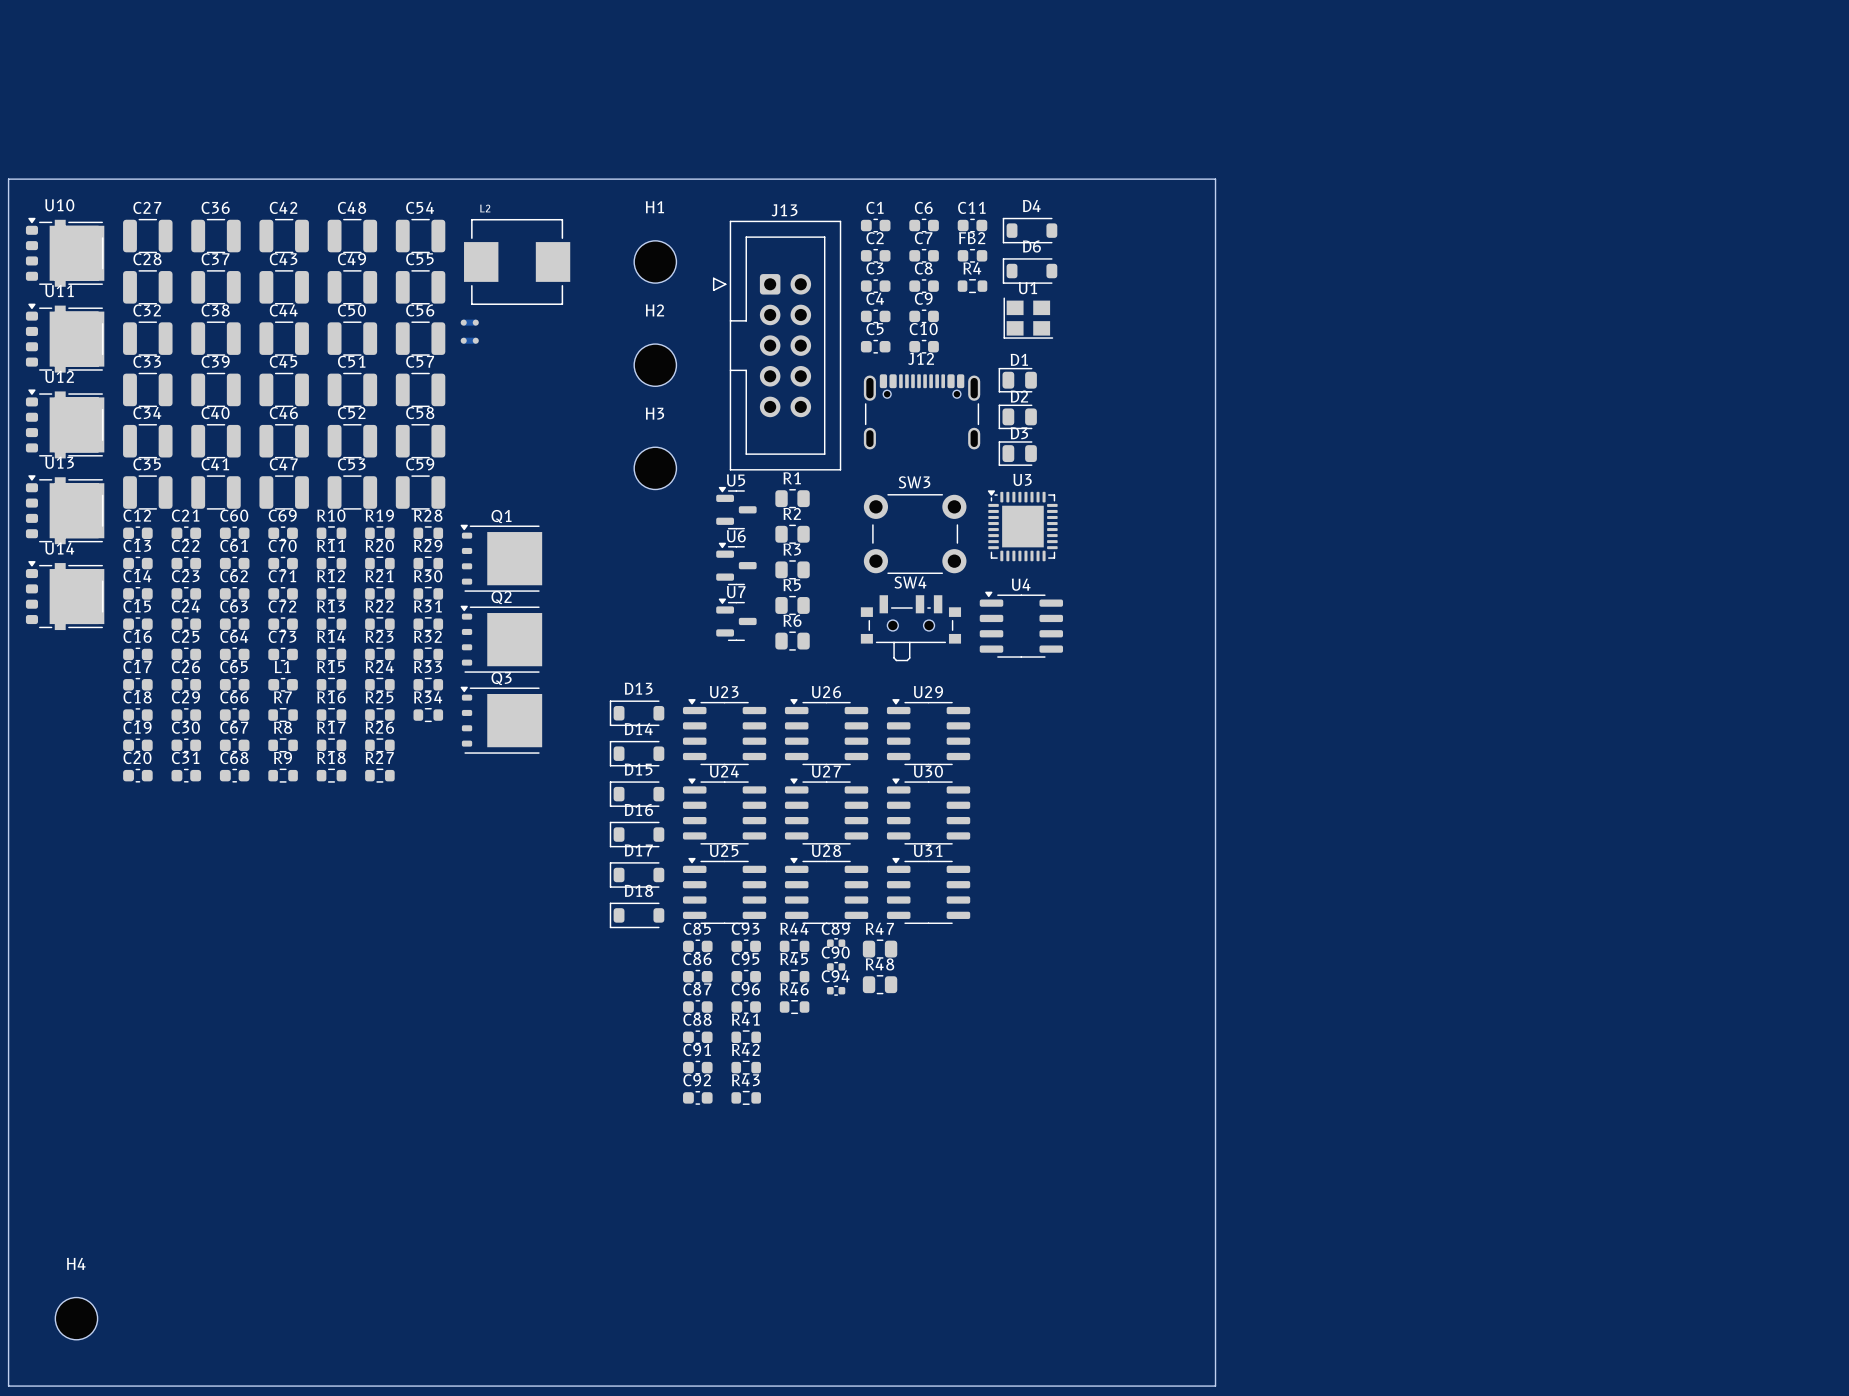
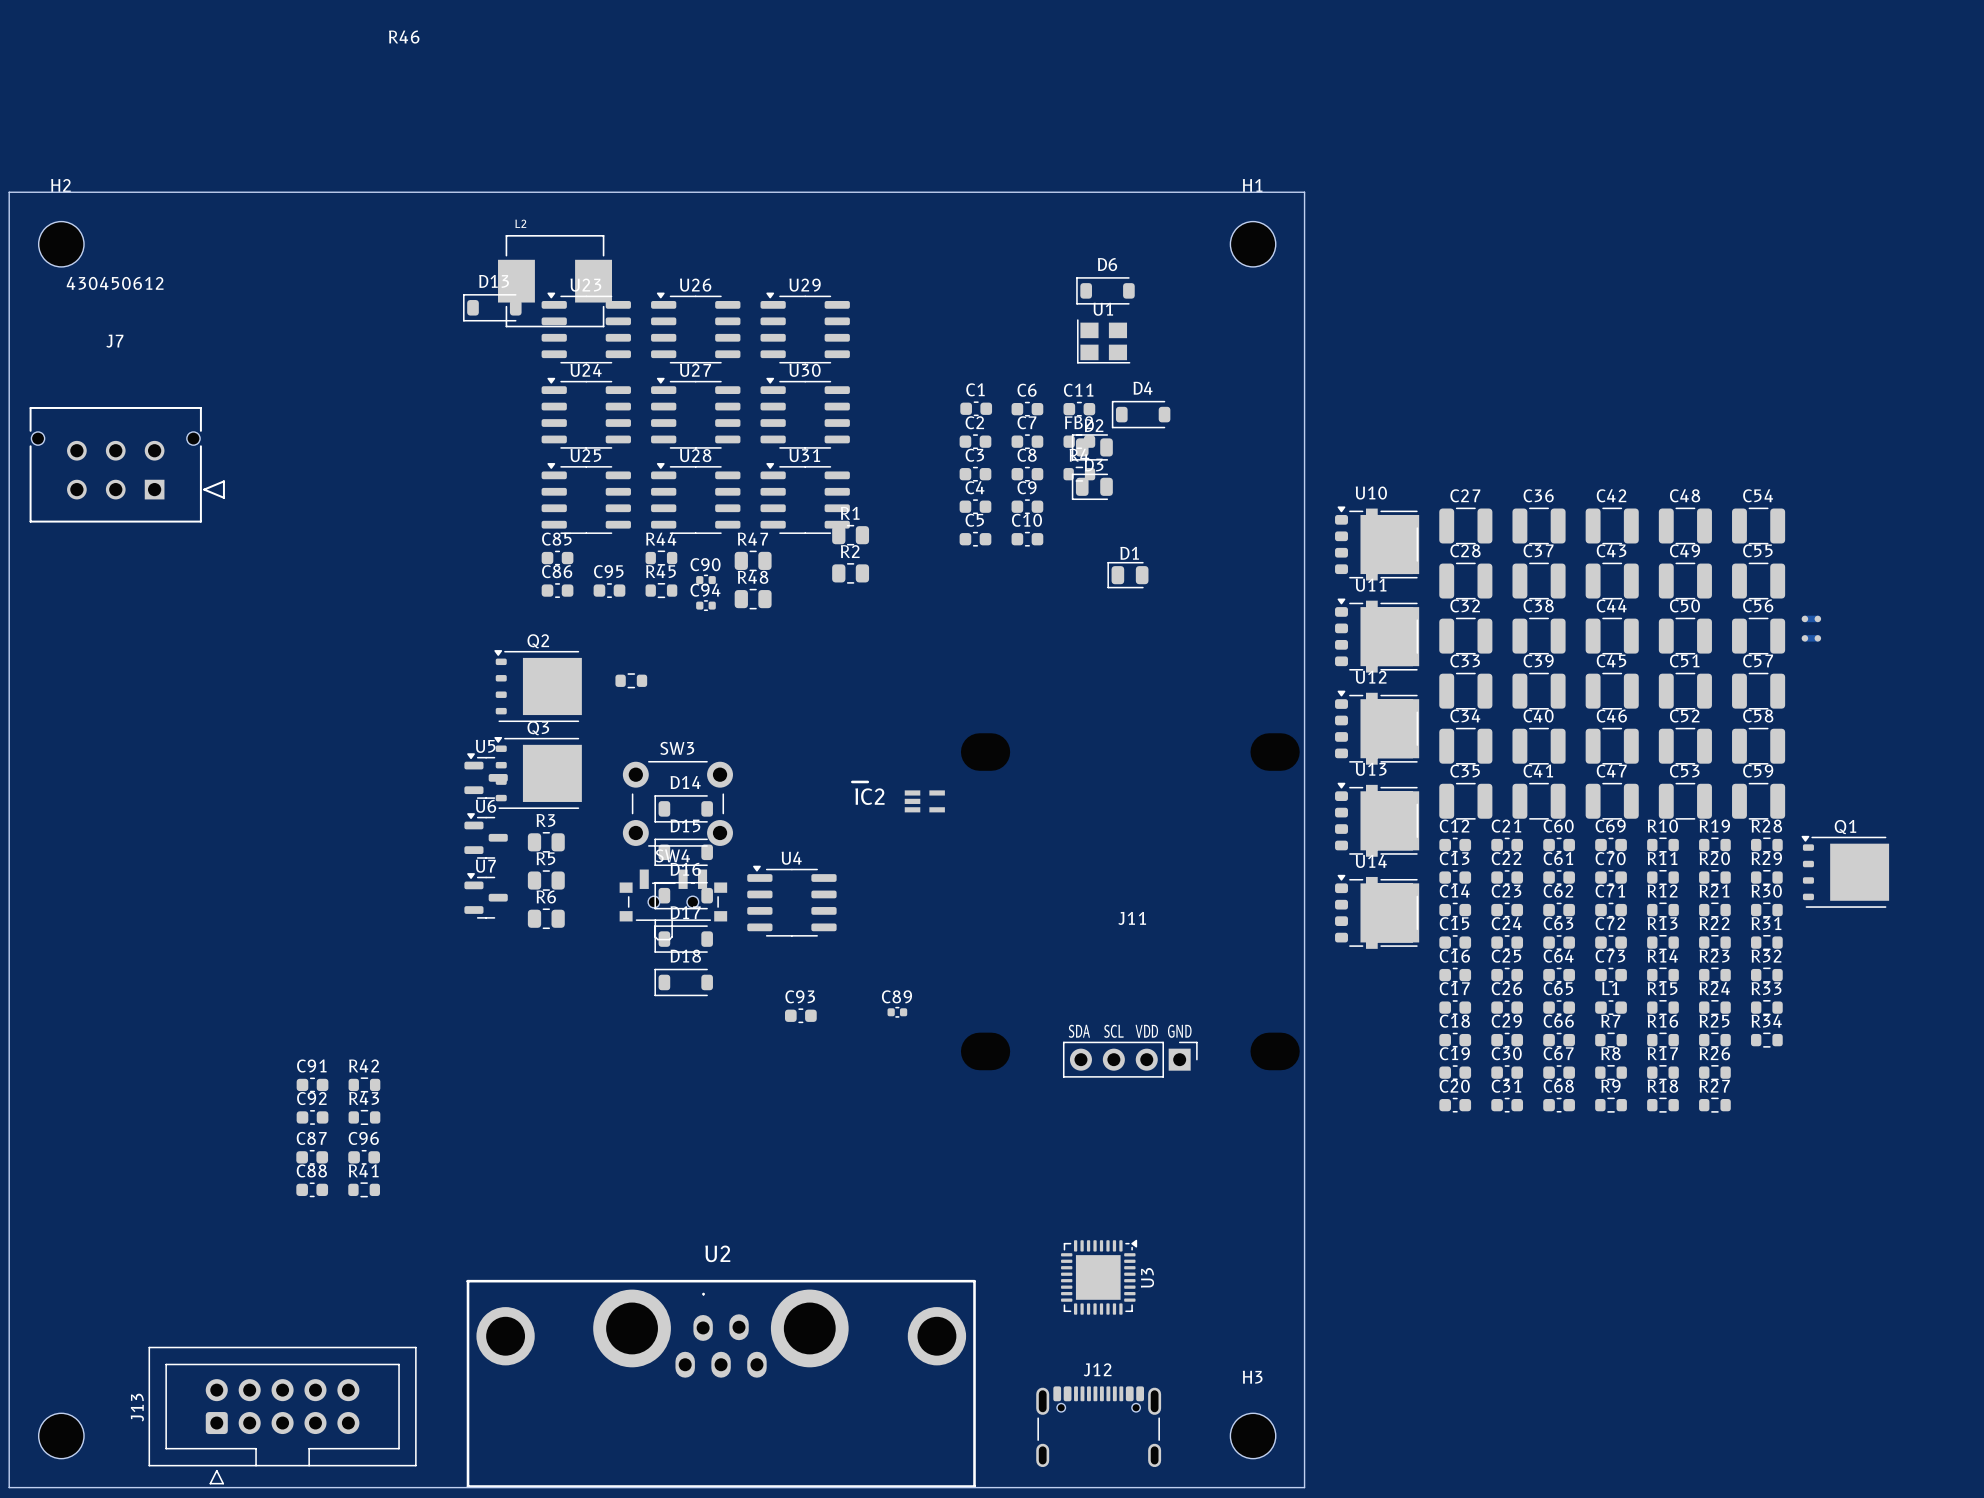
C1 position: (875, 225) -> (976, 408)
C6 position: (924, 225) -> (1027, 409)
C11 position: (972, 225) -> (1079, 409)
D4 position: (1030, 230) -> (1141, 414)
C27 position: (147, 236) -> (1465, 525)
C36 position: (215, 236) -> (1539, 525)
C42 position: (284, 236) -> (1612, 525)
C48 position: (352, 236) -> (1685, 525)
C54 position: (420, 236) -> (1758, 525)
U10 position: (65, 252) -> (1377, 543)
C2 position: (875, 255) -> (975, 441)
C7 position: (924, 255) -> (1027, 441)
FB2 position: (972, 255) -> (1079, 441)
H1 position: (655, 261) -> (1253, 244)
C3 position: (875, 286) -> (975, 474)
C8 position: (924, 286) -> (1027, 474)
R4 position: (972, 286) -> (1079, 474)
C28 position: (147, 287) -> (1465, 581)
C37 position: (215, 287) -> (1539, 581)
C43 position: (284, 287) -> (1612, 581)
C49 position: (352, 287) -> (1685, 581)
C55 position: (420, 287) -> (1758, 581)
C4 position: (875, 316) -> (975, 506)
C9 position: (924, 316) -> (1027, 506)
part: (469, 322) -> none
U11 position: (65, 338) -> (1377, 635)
C32 position: (147, 338) -> (1465, 636)
C38 position: (215, 338) -> (1539, 636)
C44 position: (284, 338) -> (1612, 636)
C50 position: (352, 338) -> (1685, 636)
C56 position: (420, 338) -> (1758, 636)
part: (469, 340) -> none
J13 rotation: 0° (777, 345) -> 90° counterclockwise (282, 1415)
J13 position: (777, 345) -> (282, 1415)
C5 position: (875, 346) -> (975, 539)
C10 position: (924, 346) -> (1027, 539)
H2 position: (655, 365) -> (61, 244)
D1 position: (1017, 380) -> (1127, 575)
C33 position: (147, 389) -> (1465, 691)
C39 position: (215, 389) -> (1539, 691)
C45 position: (284, 389) -> (1612, 691)
C51 position: (352, 389) -> (1685, 691)
C57 position: (420, 389) -> (1758, 691)
J12 position: (922, 411) -> (1098, 1426)
U12 position: (65, 423) -> (1377, 727)
J7: none -> (127, 464)
C34 position: (147, 441) -> (1465, 746)
C40 position: (215, 441) -> (1539, 746)
C46 position: (284, 441) -> (1612, 746)
C52 position: (352, 441) -> (1685, 746)
C58 position: (420, 441) -> (1758, 746)
H3 position: (655, 468) -> (1253, 1435)
C35 position: (147, 492) -> (1465, 801)
C41 position: (215, 492) -> (1539, 801)
C47 position: (284, 492) -> (1612, 801)
C53 position: (352, 492) -> (1685, 801)
C59 position: (420, 492) -> (1758, 801)
U5 position: (736, 508) -> (486, 776)
U13 position: (65, 509) -> (1377, 819)
U3 rotation: 0° (1022, 525) -> 90° clockwise (1099, 1277)
U3 position: (1022, 525) -> (1099, 1277)
C12 position: (137, 533) -> (1455, 845)
C21 position: (186, 533) -> (1507, 845)
C60 position: (234, 533) -> (1559, 845)
C69 position: (283, 533) -> (1611, 845)
R10 position: (331, 533) -> (1662, 845)
R19 position: (379, 533) -> (1714, 845)
R28 position: (428, 533) -> (1766, 845)
SW3 position: (915, 534) -> (677, 803)
Q1 position: (501, 558) -> (1845, 871)
C13 position: (137, 563) -> (1455, 877)
C22 position: (186, 563) -> (1507, 877)
C61 position: (234, 563) -> (1559, 877)
C70 position: (283, 563) -> (1611, 877)
R11 position: (331, 563) -> (1662, 877)
R20 position: (379, 563) -> (1714, 877)
R29 position: (428, 563) -> (1766, 877)
U6 position: (736, 563) -> (486, 835)
R3 position: (792, 569) -> (546, 842)
part: none -> (1811, 618)
C14 position: (137, 593) -> (1455, 910)
C23 position: (186, 593) -> (1507, 910)
C62 position: (234, 593) -> (1559, 910)
C71 position: (283, 593) -> (1611, 910)
R12 position: (331, 593) -> (1662, 910)
R21 position: (379, 593) -> (1714, 910)
R30 position: (428, 593) -> (1766, 910)
part: none -> (1811, 638)
U14 position: (65, 595) -> (1377, 911)
R5 position: (792, 605) -> (546, 880)
U7 position: (736, 619) -> (486, 895)
C15 position: (137, 624) -> (1455, 942)
C24 position: (186, 624) -> (1507, 942)
C63 position: (234, 624) -> (1559, 942)
C72 position: (283, 624) -> (1611, 942)
R13 position: (331, 624) -> (1662, 942)
R22 position: (379, 624) -> (1714, 942)
R31 position: (428, 624) -> (1766, 942)
U4 position: (1021, 624) -> (791, 901)
SW4 position: (910, 628) -> (673, 904)
R6 position: (792, 641) -> (546, 918)
C16 position: (137, 654) -> (1455, 975)
C25 position: (186, 654) -> (1507, 975)
C64 position: (234, 654) -> (1559, 975)
C73 position: (283, 654) -> (1611, 975)
R14 position: (331, 654) -> (1662, 975)
R23 position: (379, 654) -> (1714, 975)
R32 position: (428, 654) -> (1766, 975)
C17 position: (137, 684) -> (1455, 1007)
C26 position: (186, 684) -> (1507, 1007)
C65 position: (234, 684) -> (1559, 1007)
L1 position: (283, 684) -> (1611, 1007)
R15 position: (331, 684) -> (1662, 1007)
R24 position: (379, 684) -> (1714, 1007)
R33 position: (428, 684) -> (1766, 1007)
D13 position: (637, 713) -> (492, 307)
C18 position: (137, 715) -> (1455, 1040)
C29 position: (186, 715) -> (1507, 1040)
C66 position: (234, 715) -> (1559, 1040)
R7 position: (283, 715) -> (1611, 1040)
R16 position: (331, 715) -> (1662, 1040)
R25 position: (379, 715) -> (1714, 1040)
R34 position: (428, 715) -> (1766, 1040)
U23 position: (724, 732) -> (586, 328)
U26 position: (826, 732) -> (695, 328)
U29 position: (928, 732) -> (805, 328)
IC2: none -> (897, 796)
C19 position: (137, 745) -> (1455, 1072)
C30 position: (186, 745) -> (1507, 1072)
C67 position: (234, 745) -> (1559, 1072)
R8 position: (283, 745) -> (1611, 1072)
R17 position: (331, 745) -> (1662, 1072)
R26 position: (379, 745) -> (1714, 1072)
C20 position: (137, 775) -> (1455, 1105)
C31 position: (186, 775) -> (1507, 1105)
C68 position: (234, 775) -> (1559, 1105)
R9 position: (283, 775) -> (1611, 1105)
R18 position: (331, 775) -> (1662, 1105)
R27 position: (379, 775) -> (1714, 1105)
U24 position: (724, 811) -> (586, 413)
U27 position: (826, 811) -> (695, 413)
U30 position: (928, 811) -> (805, 413)
J11: none -> (1130, 905)
U25 position: (724, 890) -> (586, 498)
U28 position: (826, 890) -> (695, 498)
U31 position: (928, 890) -> (805, 498)
C85 position: (697, 946) -> (557, 558)
R44 position: (794, 946) -> (661, 558)
R47 position: (880, 949) -> (753, 560)
C90 position: (836, 966) -> (705, 580)
C86 position: (697, 976) -> (557, 590)
C95 position: (746, 976) -> (609, 590)
R45 position: (794, 976) -> (661, 590)
R48 position: (880, 984) -> (753, 599)
R46 name position: R46 (794, 989) -> R46 (404, 37)
C94 position: (836, 990) -> (705, 605)
C87 position: (697, 1007) -> (312, 1157)
C96 position: (746, 1007) -> (364, 1157)
R46 position: (794, 1007) -> (631, 680)
C88 position: (697, 1037) -> (312, 1189)
R41 position: (746, 1037) -> (364, 1189)
C91 position: (697, 1067) -> (312, 1084)
R42 position: (746, 1067) -> (364, 1084)
C92 position: (697, 1097) -> (312, 1117)
R43 position: (746, 1097) -> (364, 1117)
U2: none -> (721, 1383)
H4: (76, 1318) -> none
part: none -> (61, 1435)

